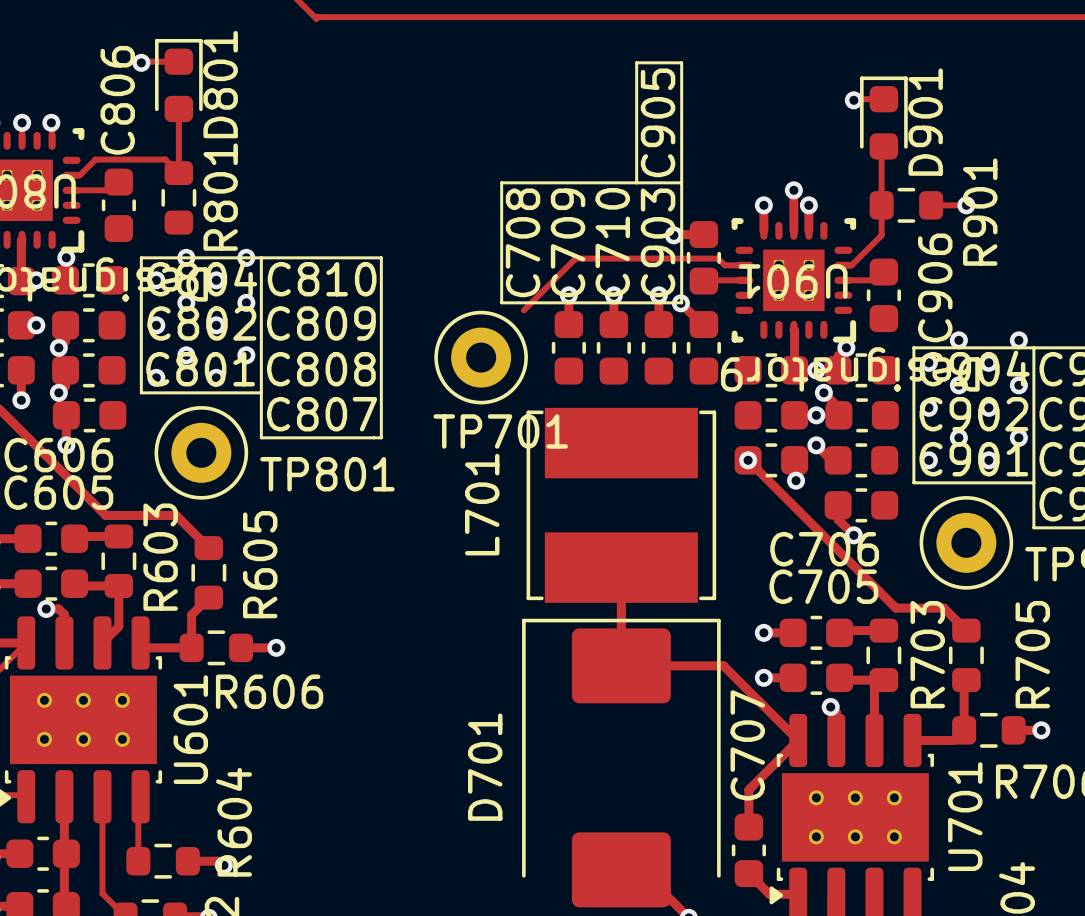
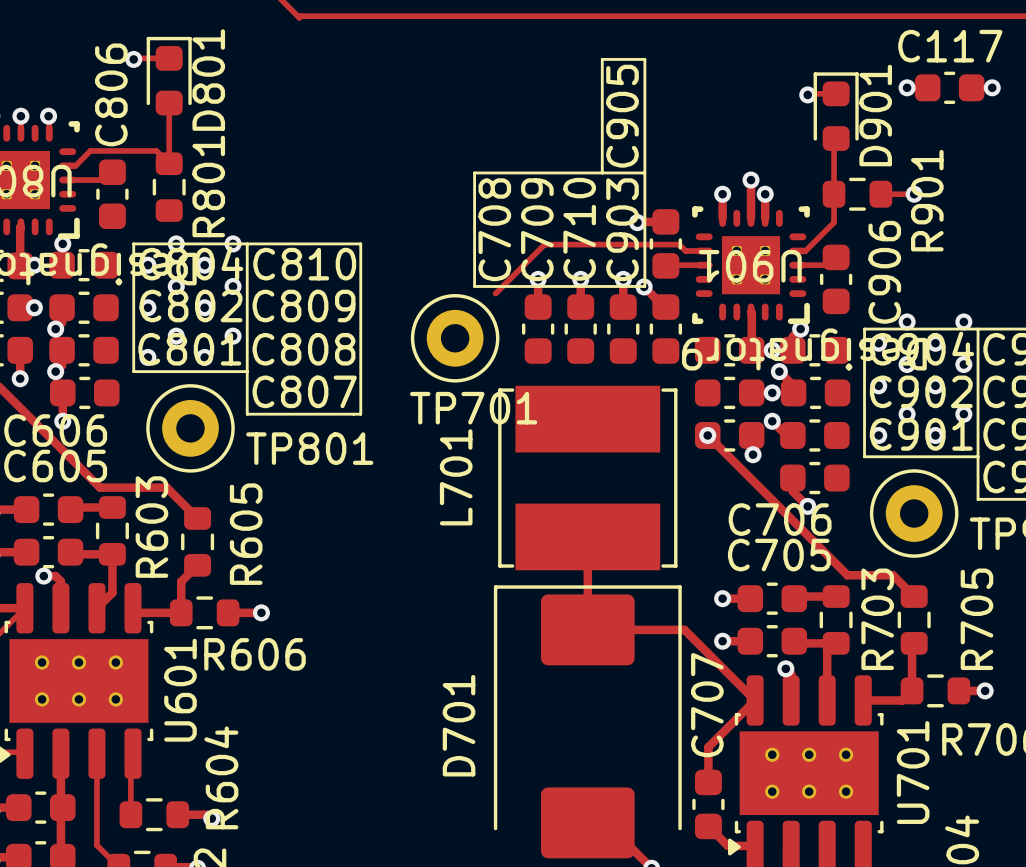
via: none -> (907, 87)
C117: none -> (949, 87)
via: none -> (992, 87)

